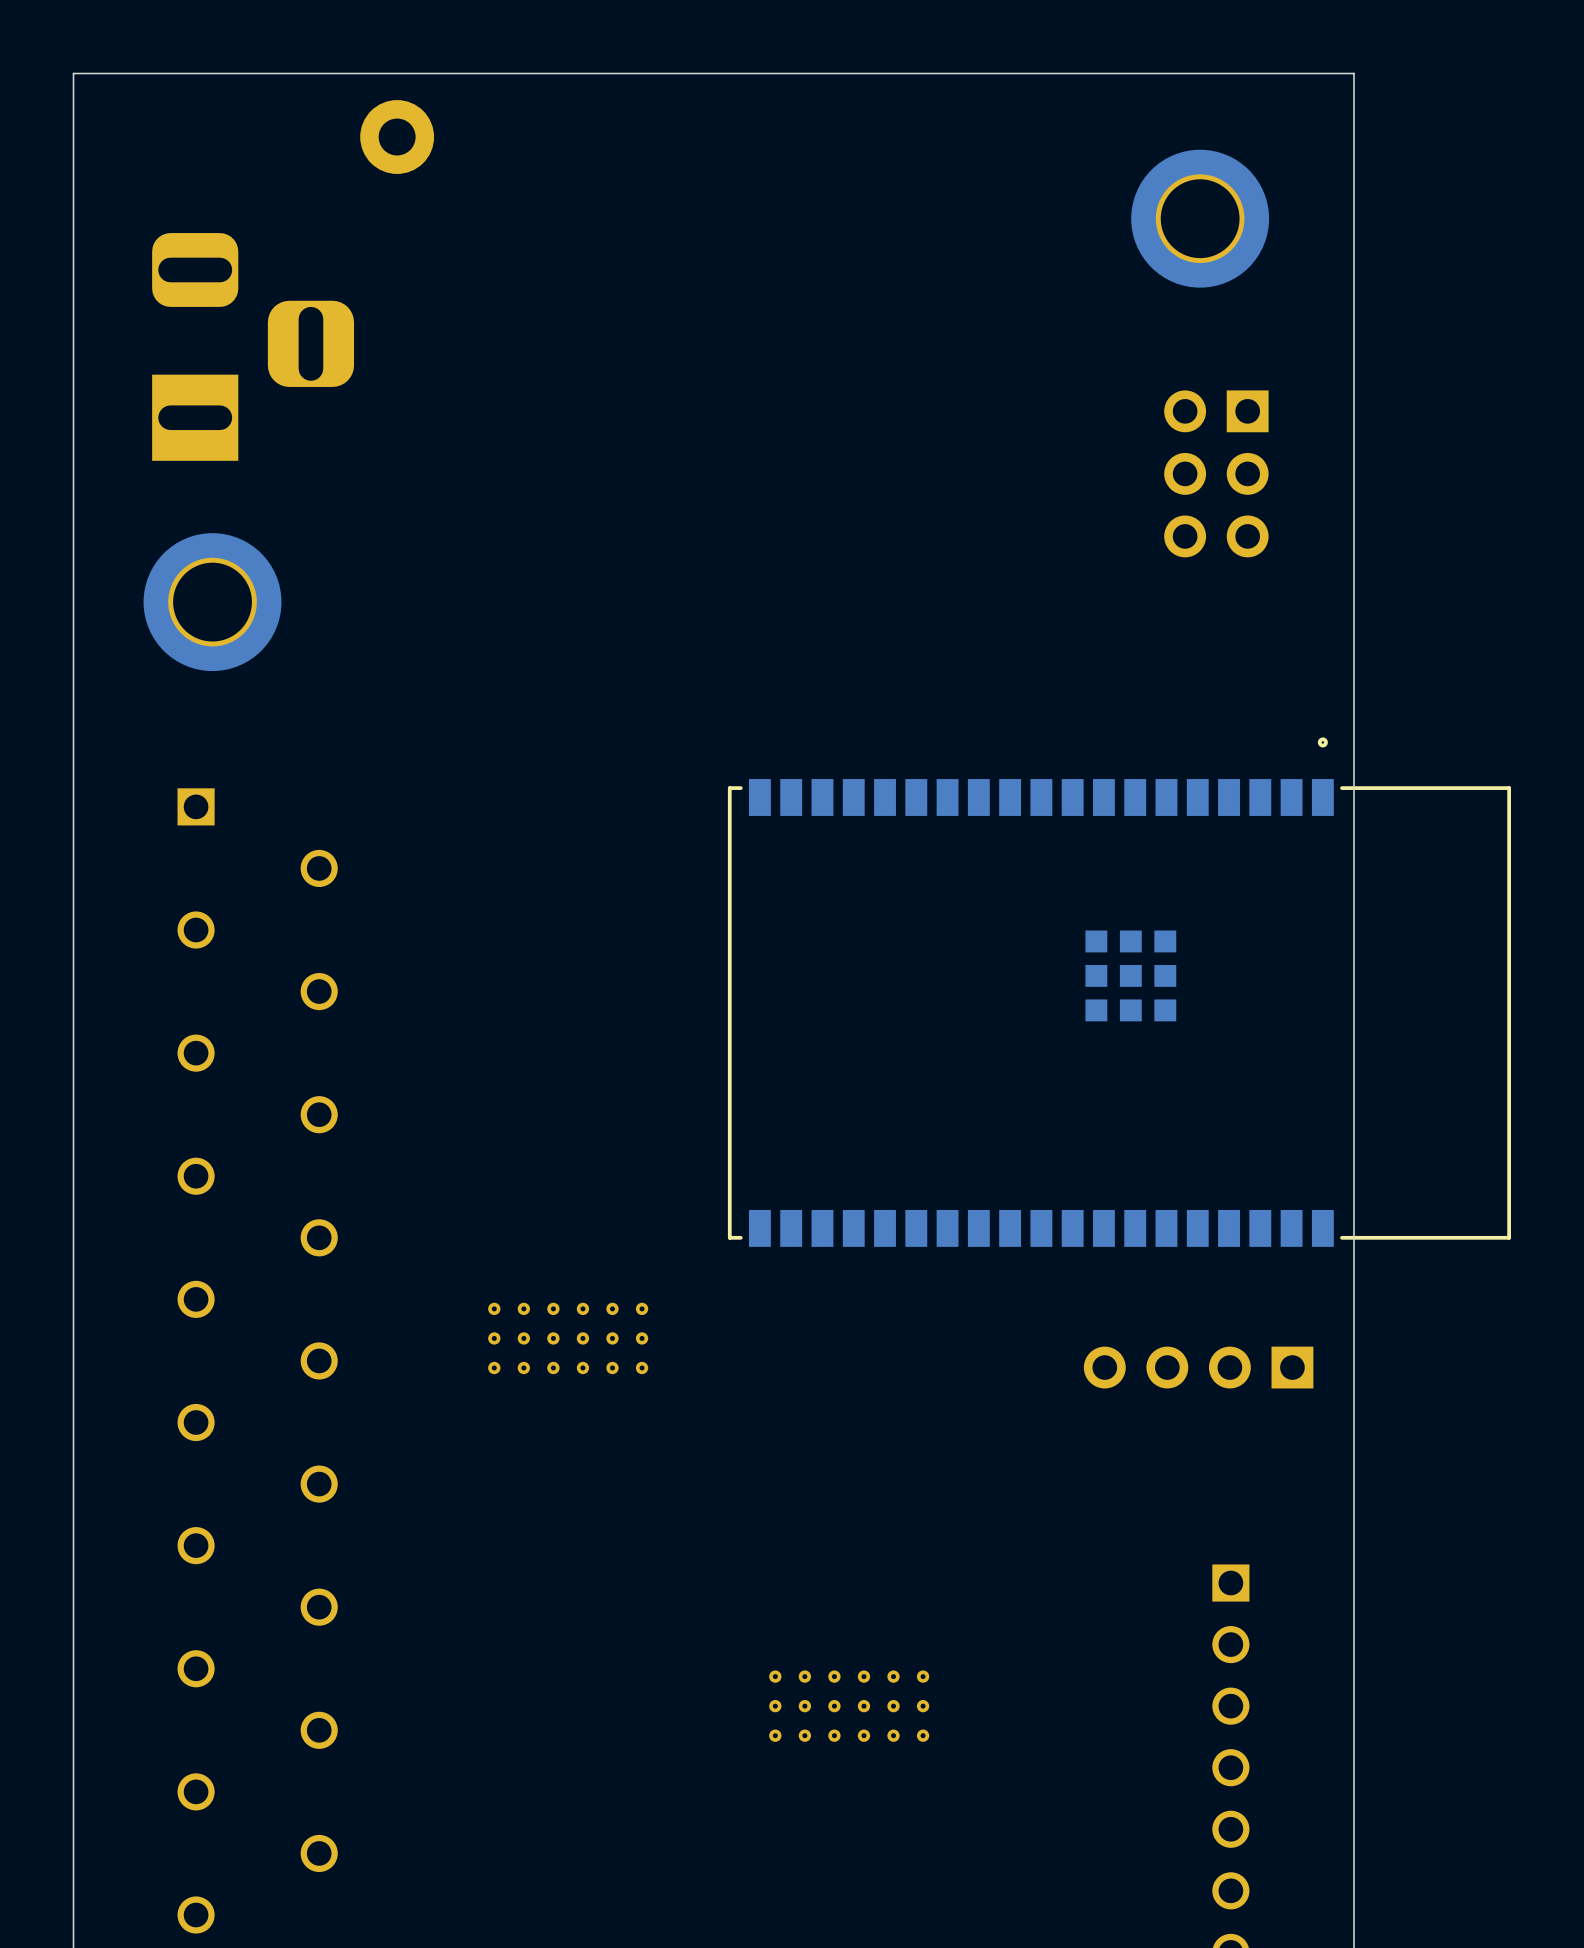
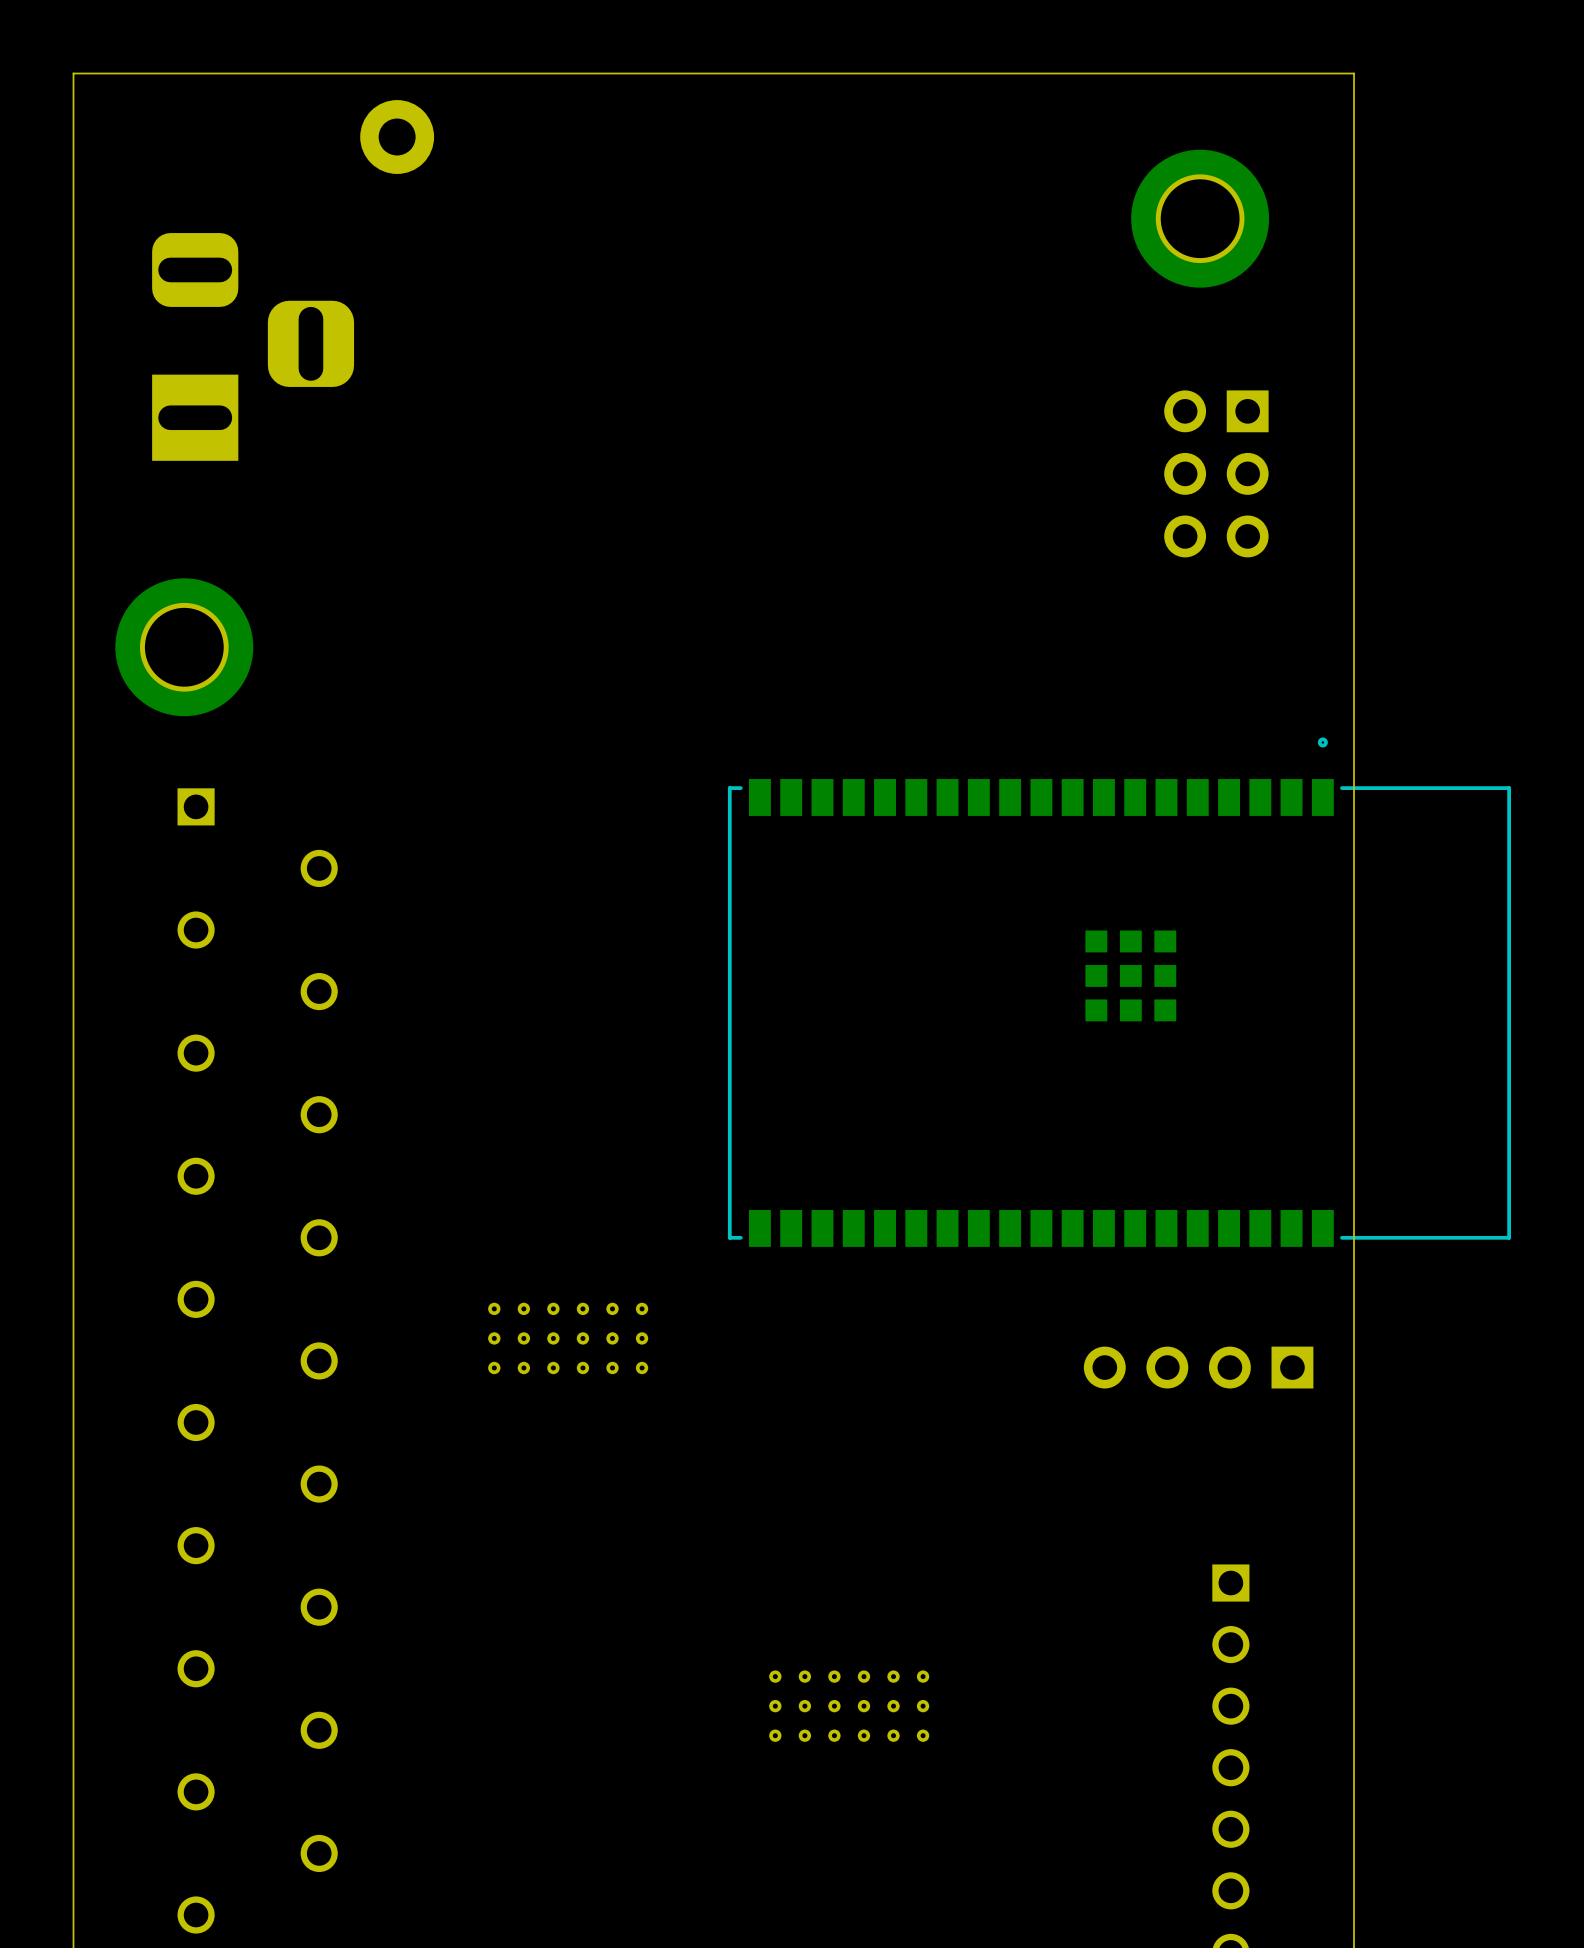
part position: (212, 602) -> (184, 647)

